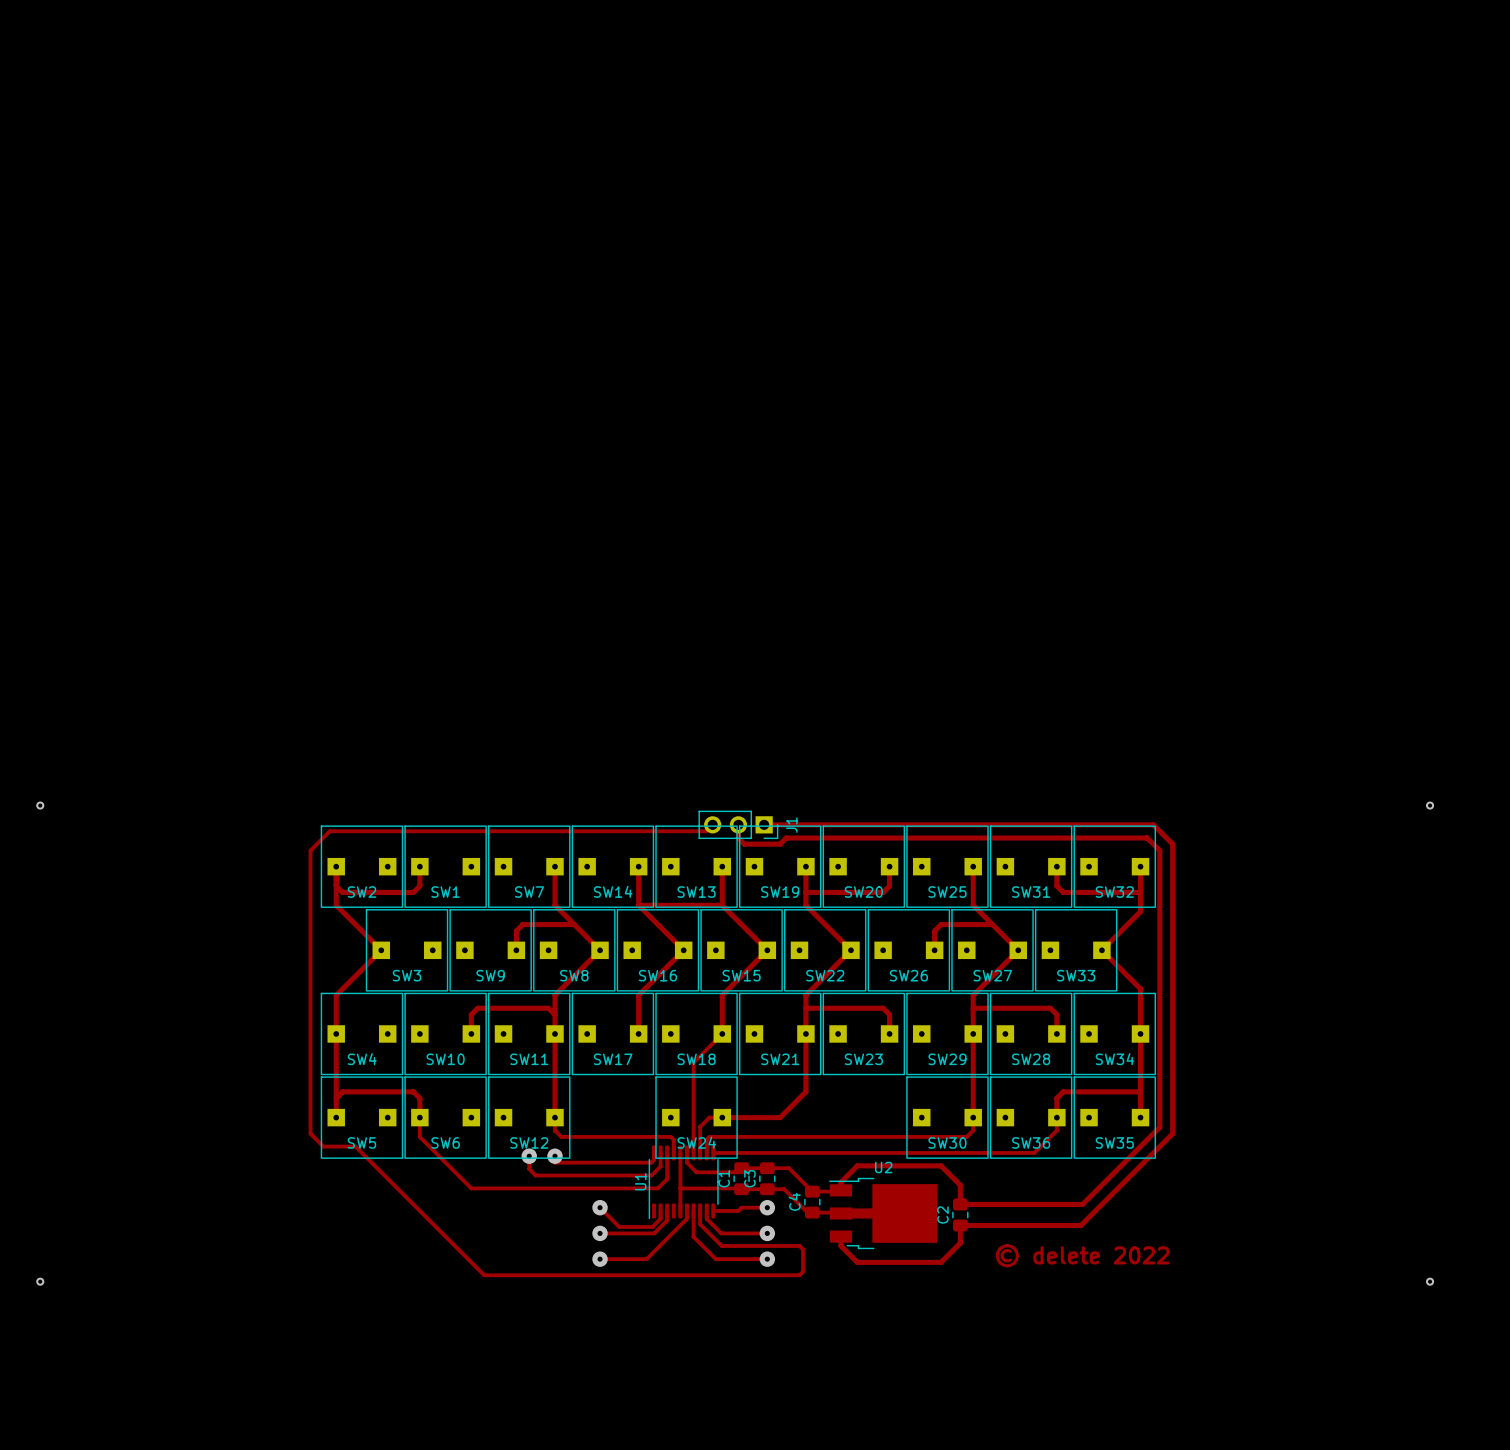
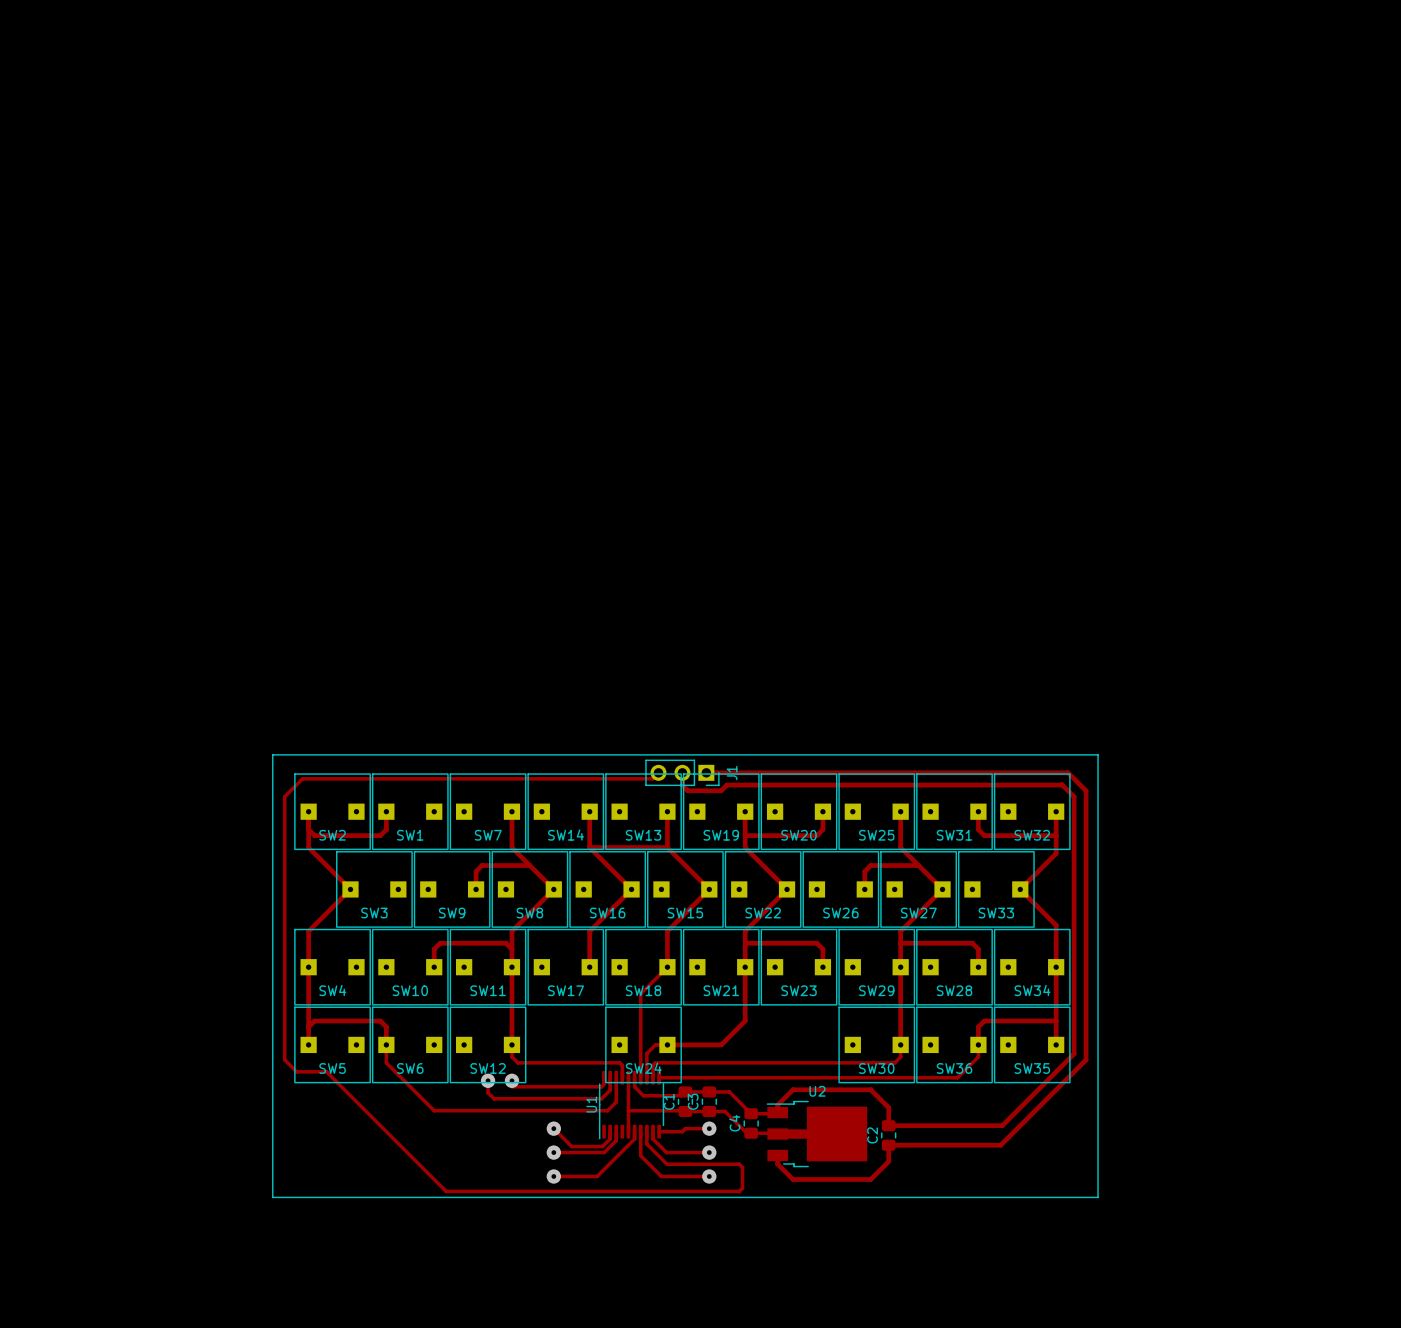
via: (40, 805) -> none
line: none -> (272, 754) (272, 1197) (1098, 1197) (1098, 754) (272, 754)
via: (1430, 805) -> none
text: © delete 2022 (1082, 1255) -> none
via: (40, 1281) -> none
via: (1430, 1281) -> none

